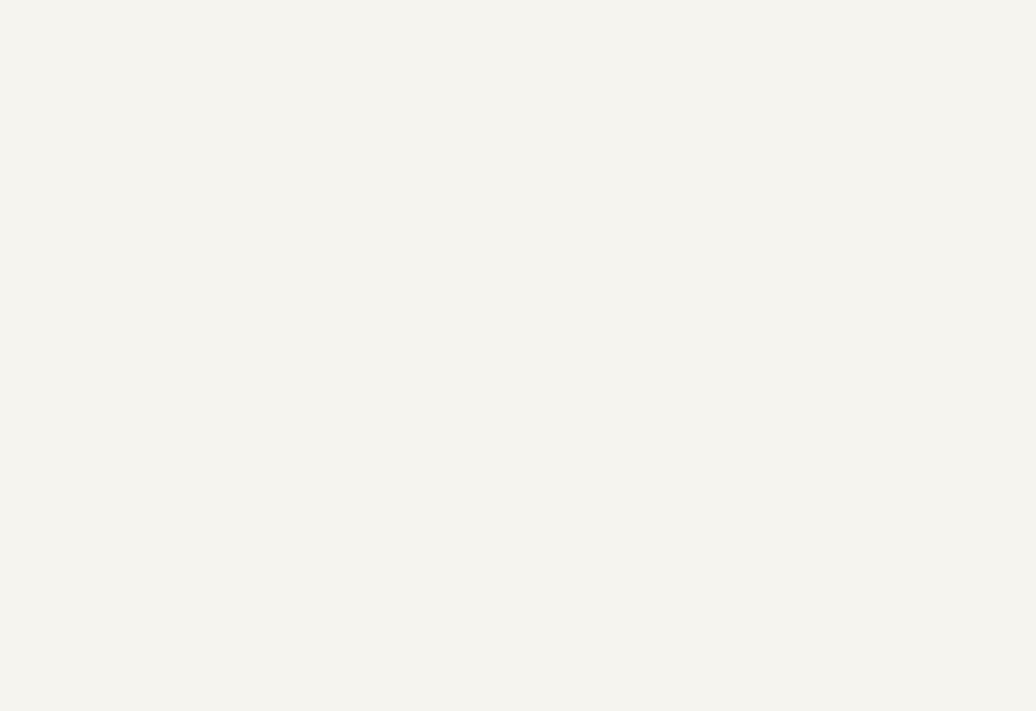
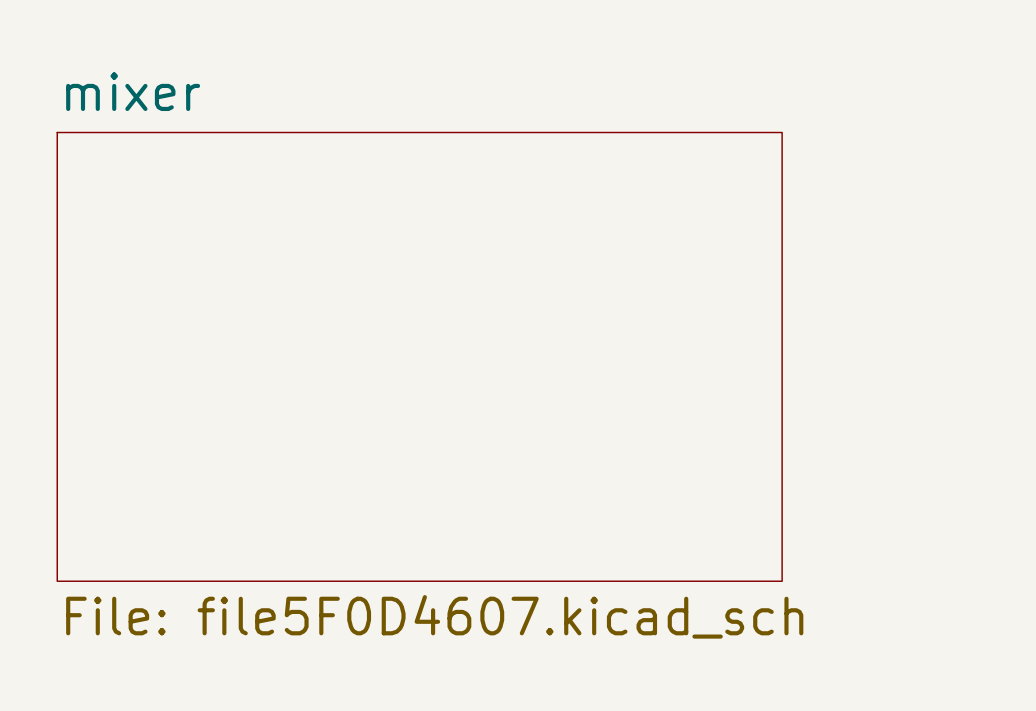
sheet mixer: none -> File: file5F0D4607.kicad_sch (419, 356)

